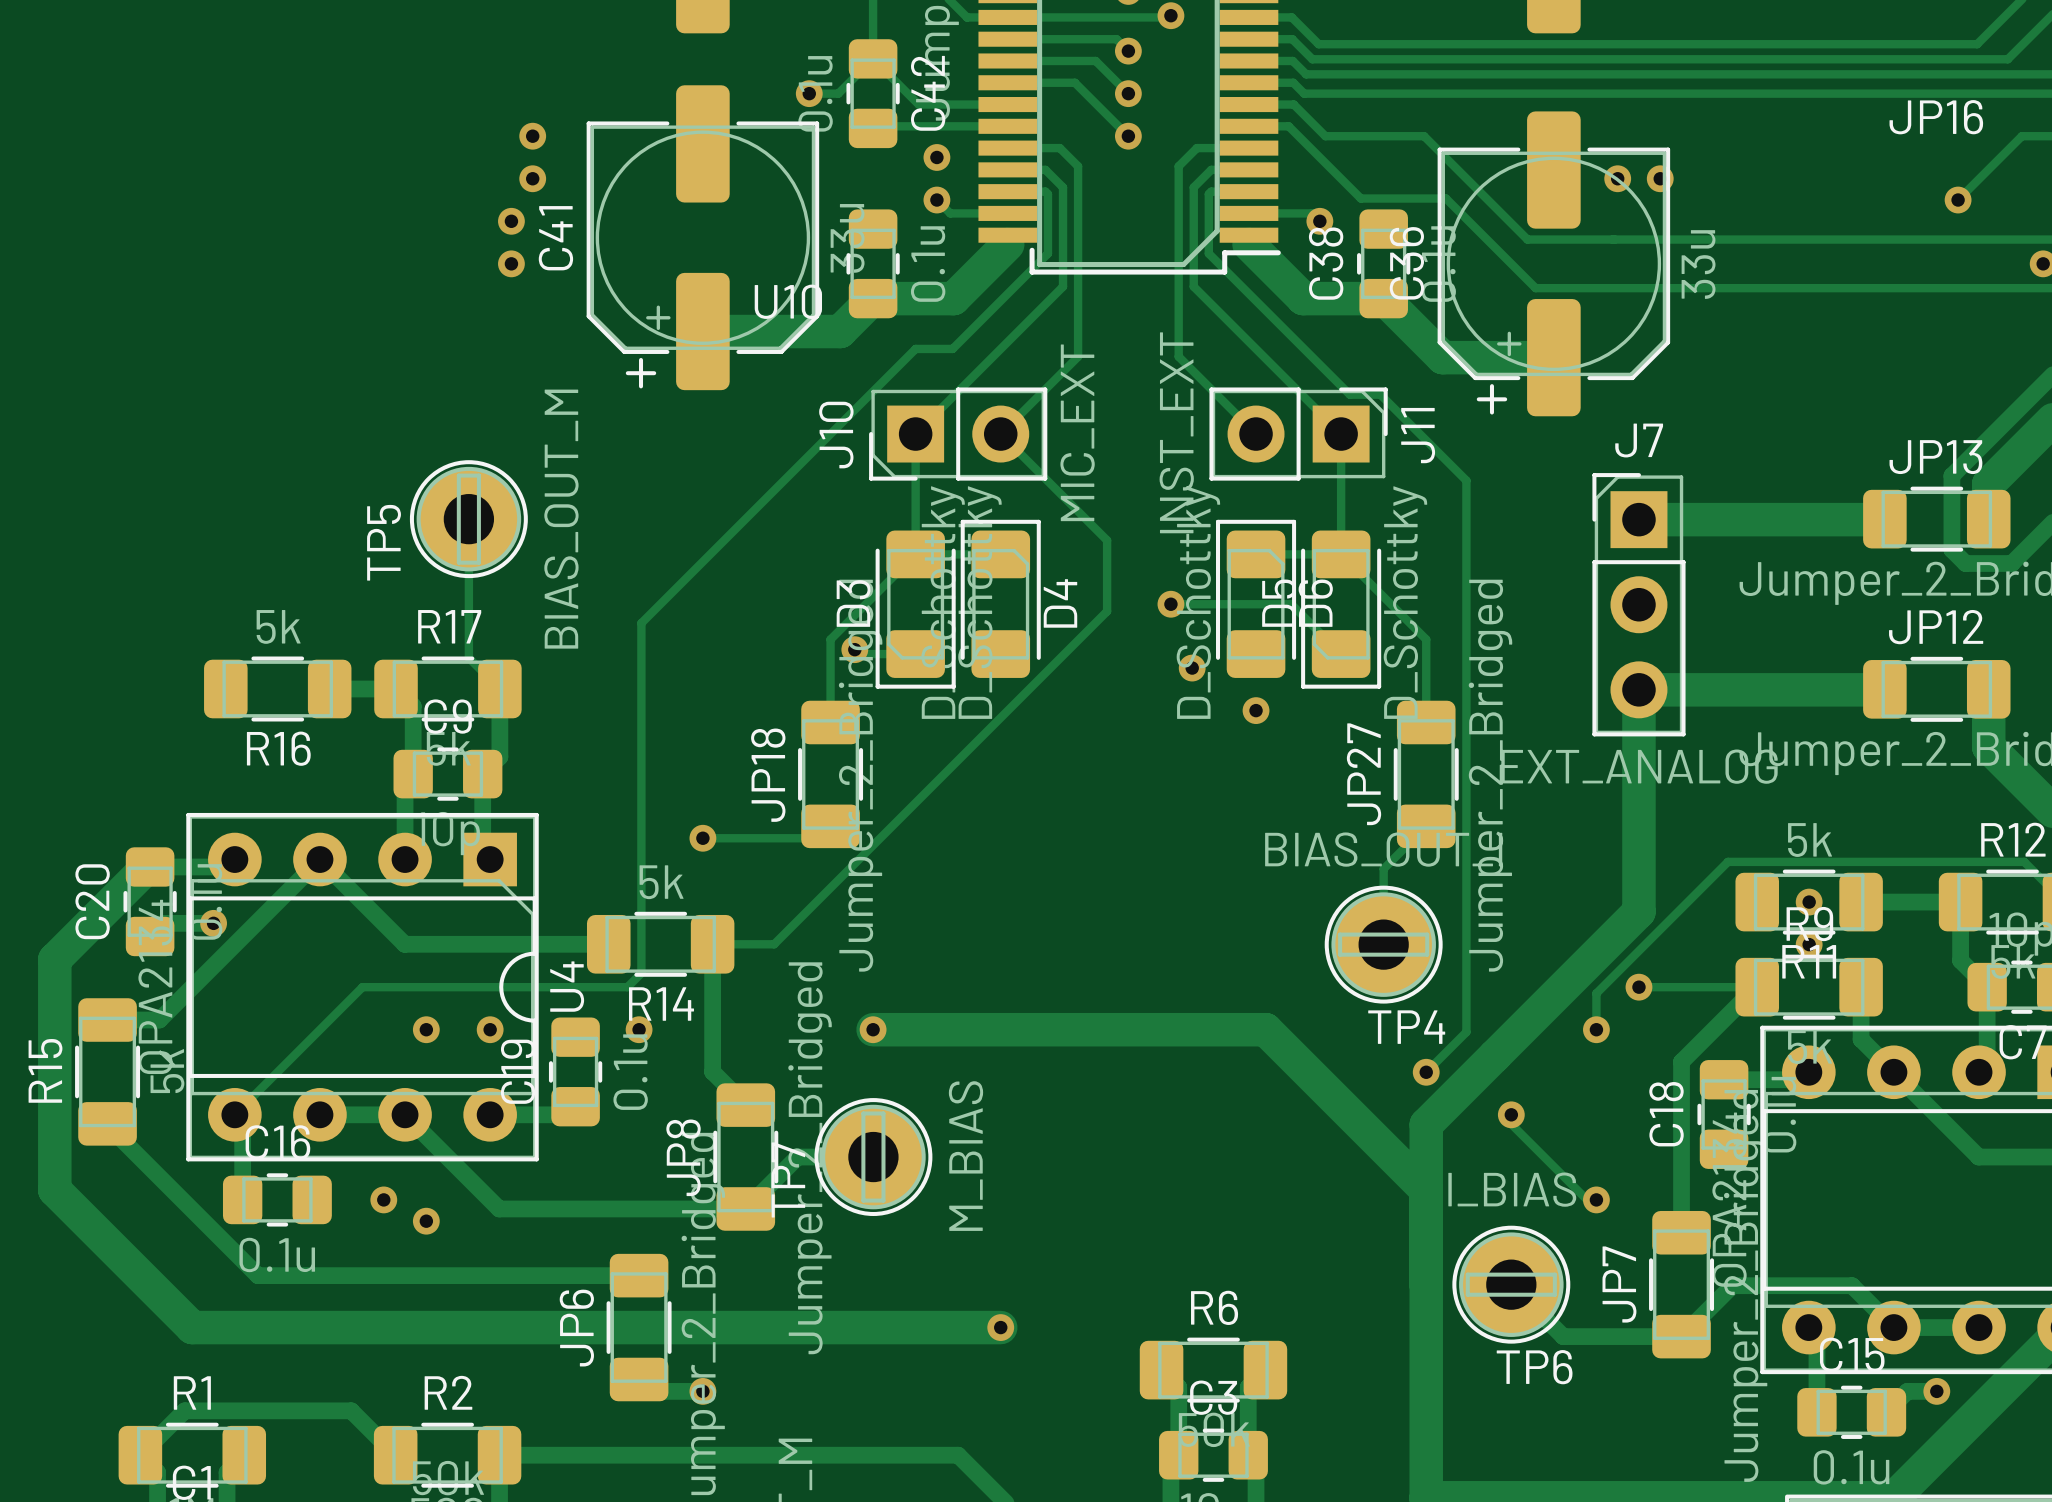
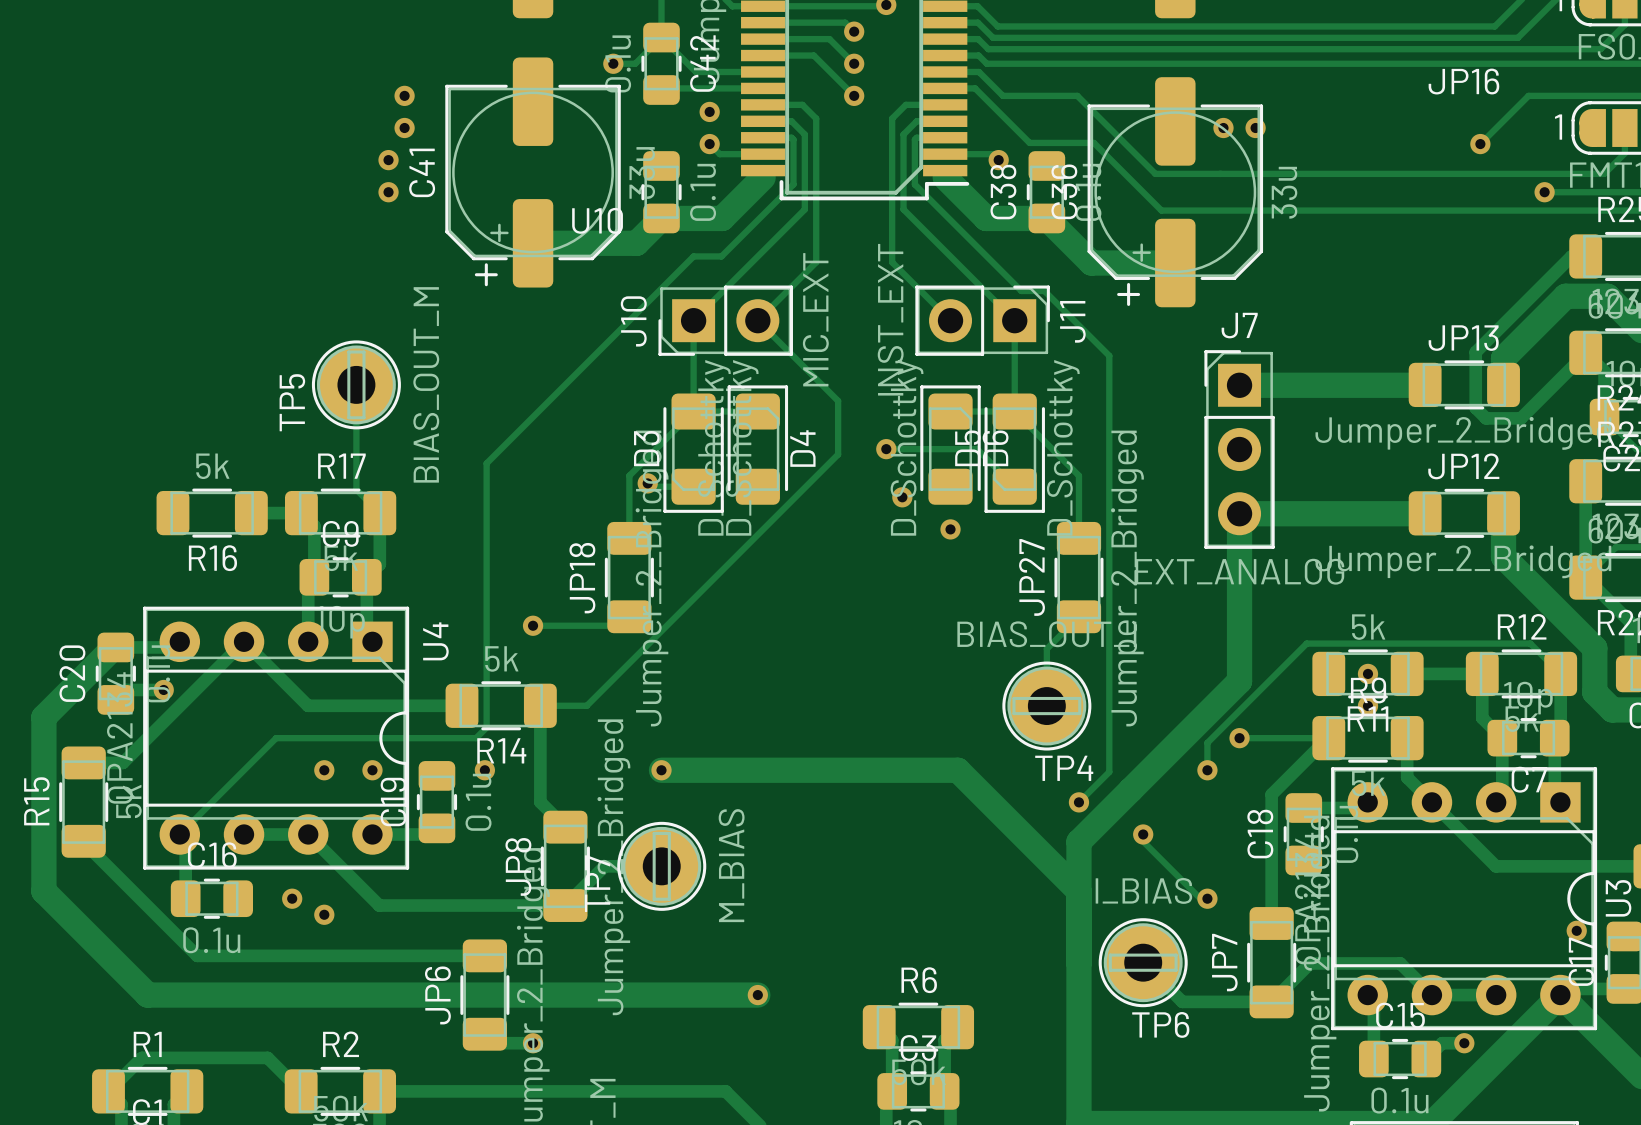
U4 name position: U4 (567, 986) -> U4 (435, 641)

